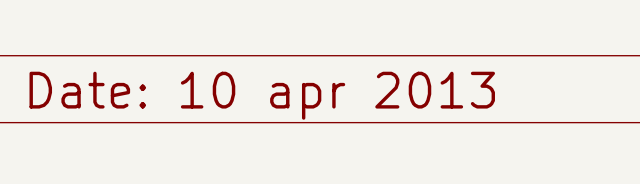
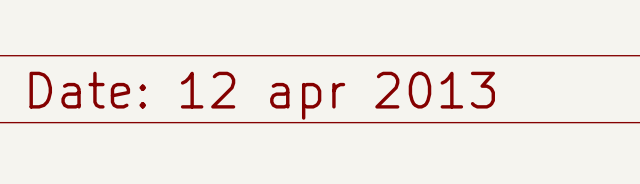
title block: Date: 10 apr 2013 (262, 95) -> Date: 12 apr 2013 (262, 95)

